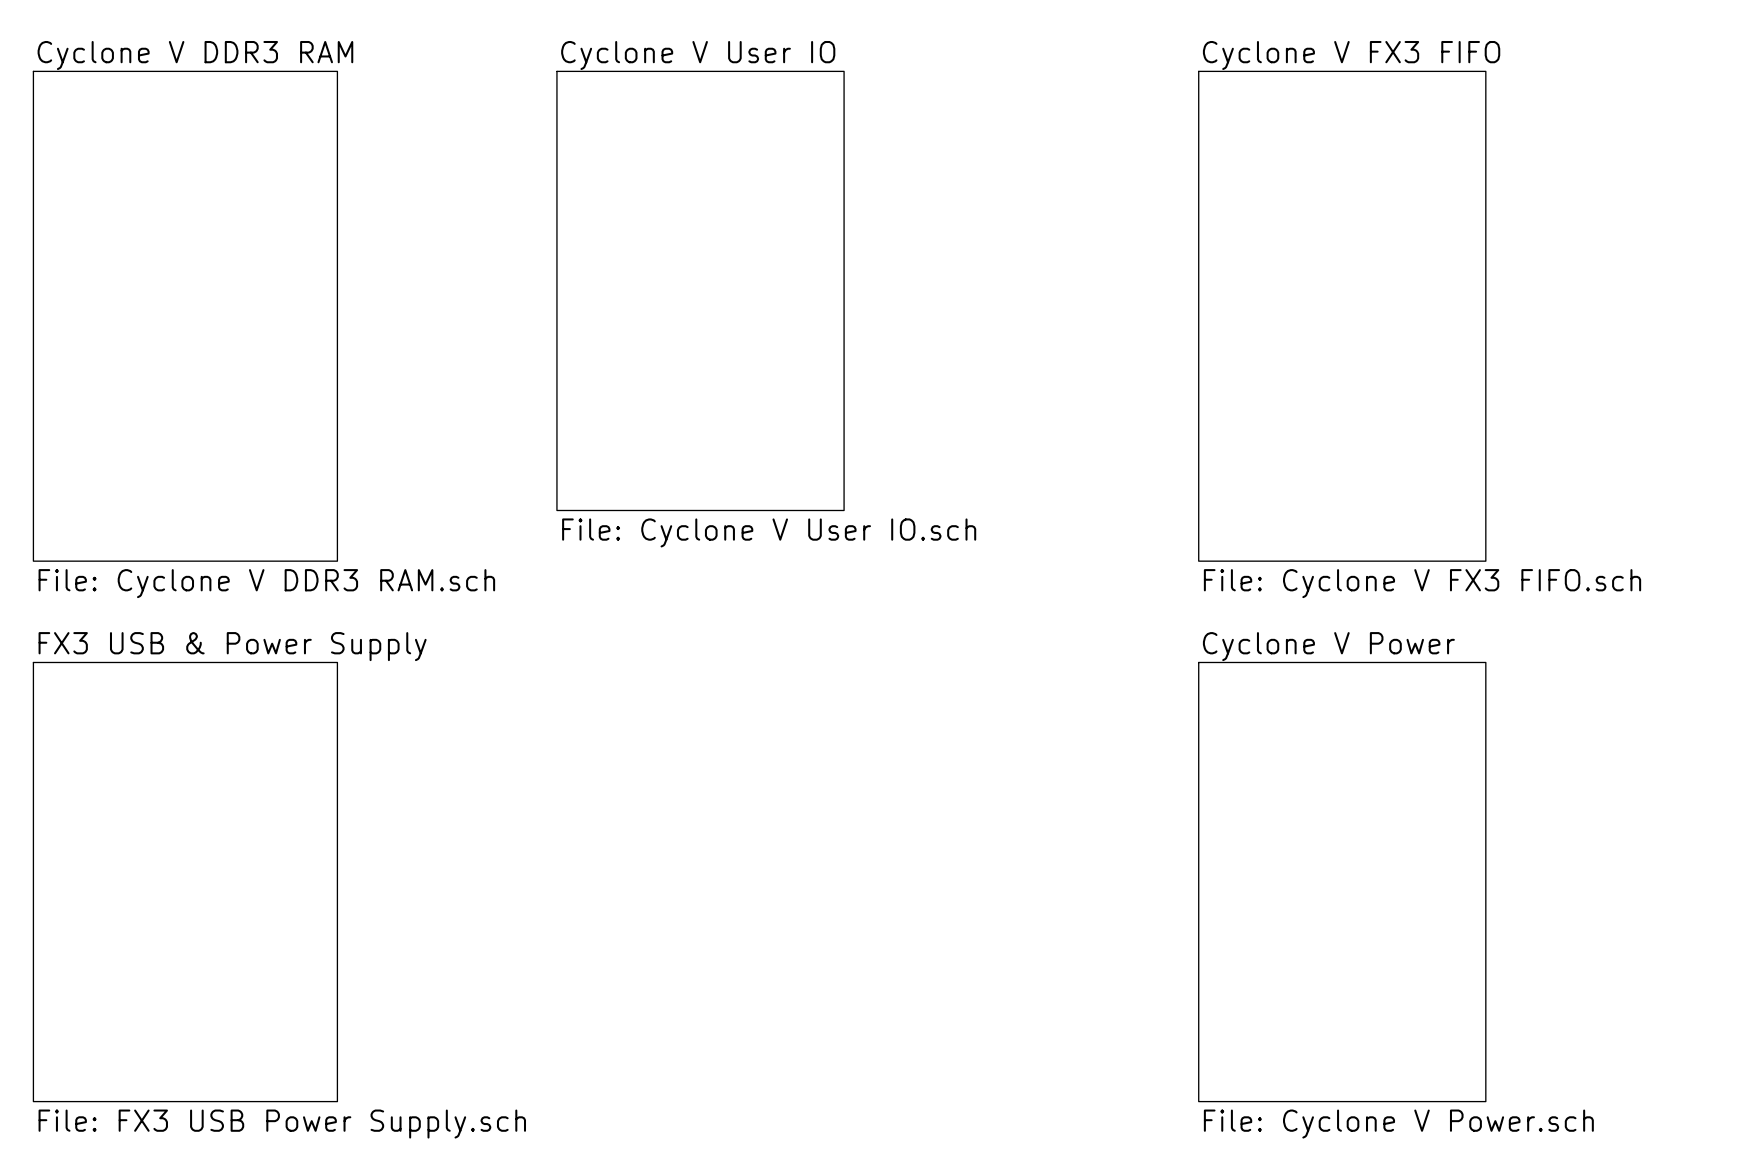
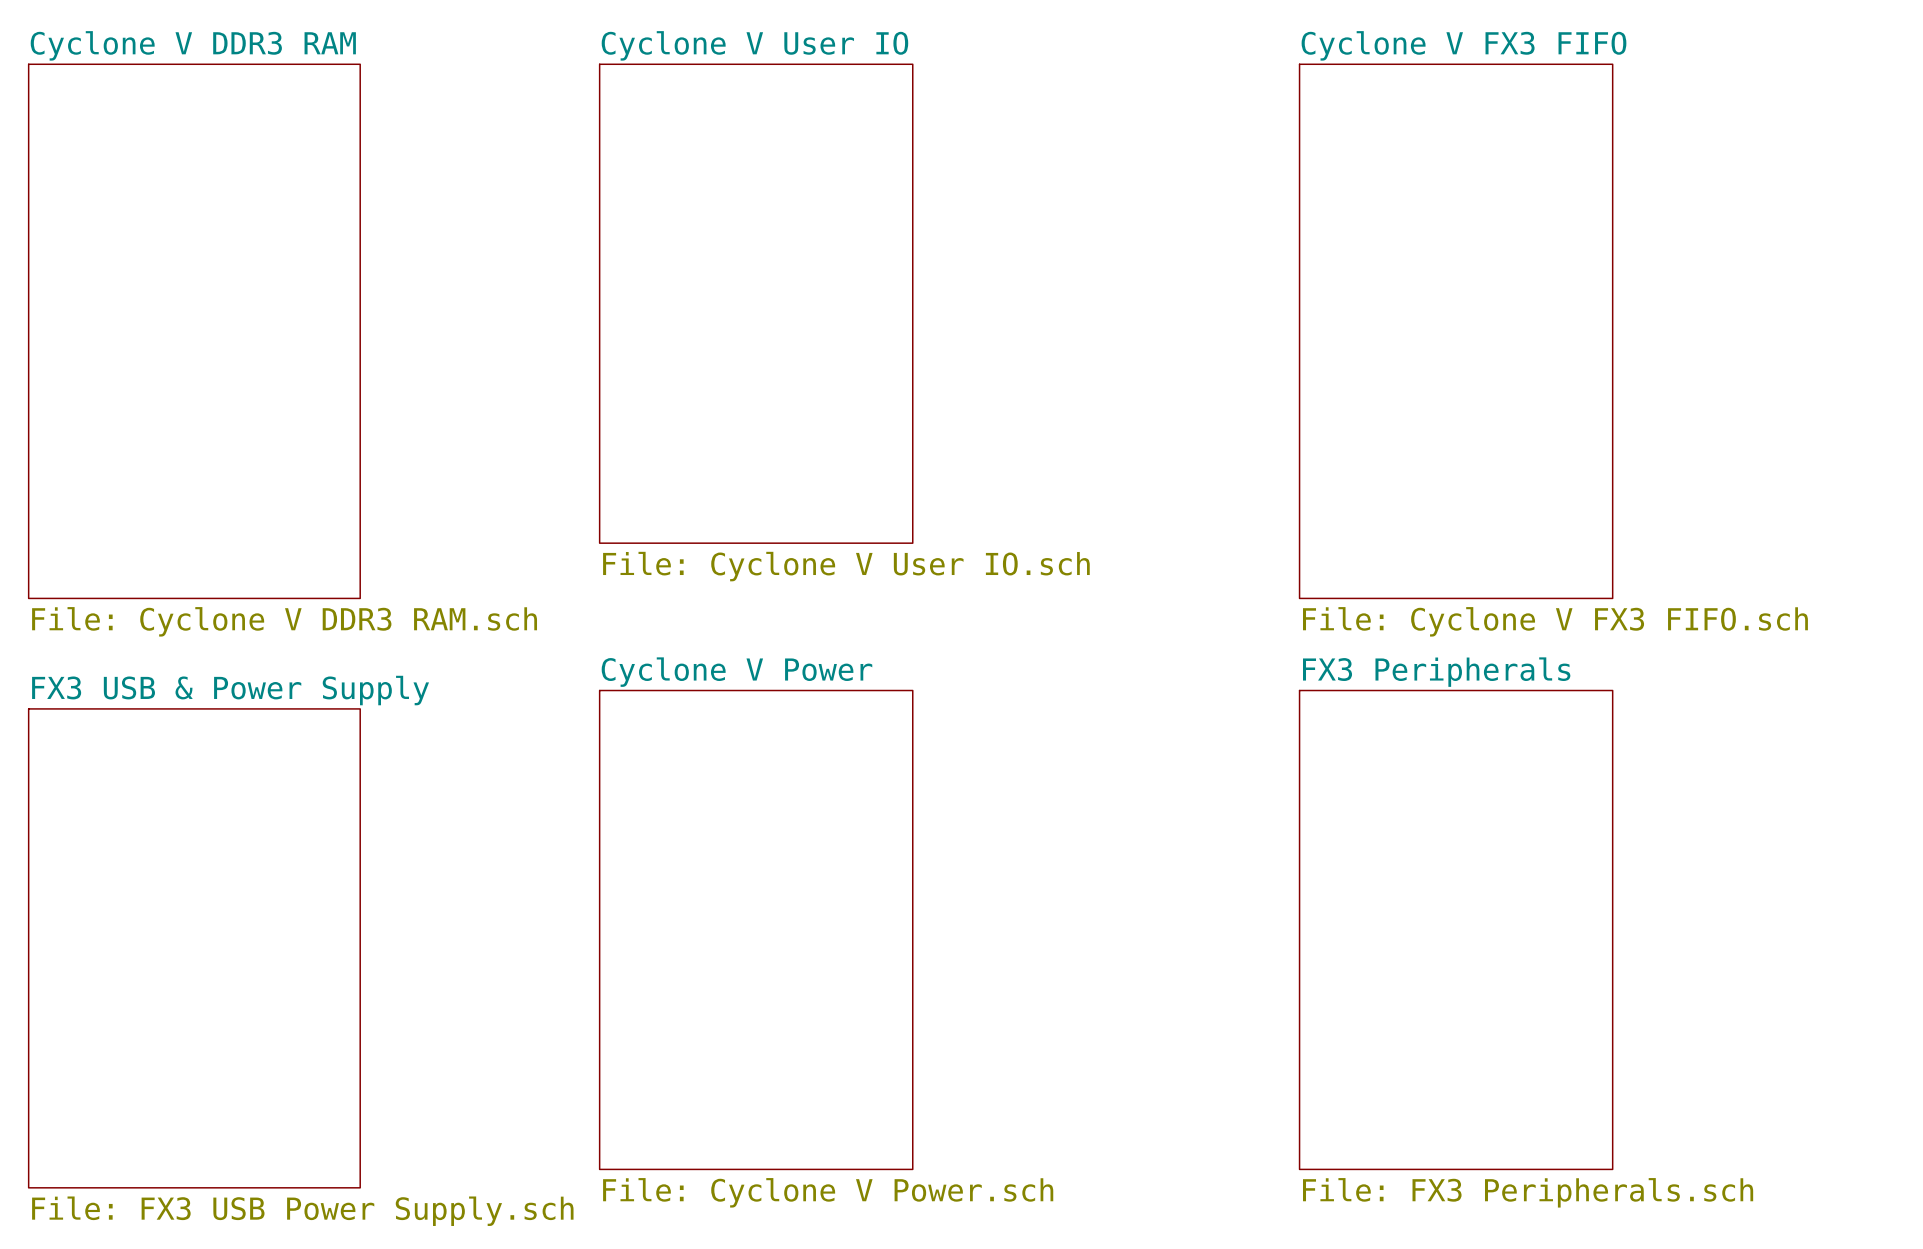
sheet Cyclone V Power: none -> File: Cyclone V Power.sch (756, 929)
sheet FX3 Peripherals: none -> File: FX3 Peripherals.sch (1456, 929)
sheet Cyclone V Power: File: Cyclone V Power.sch (1342, 882) -> none

